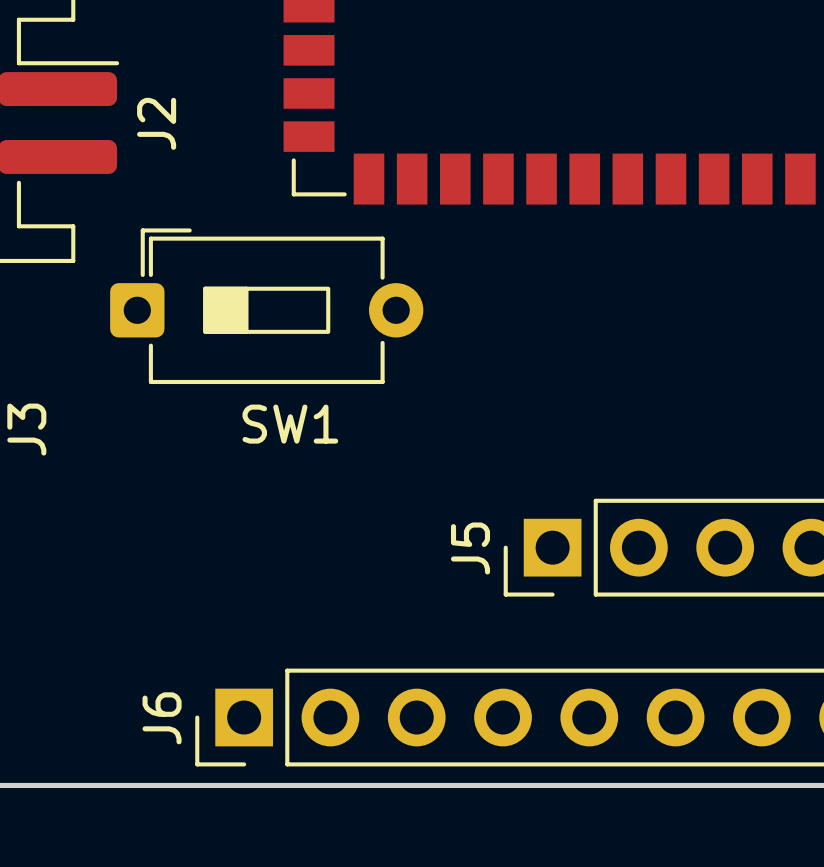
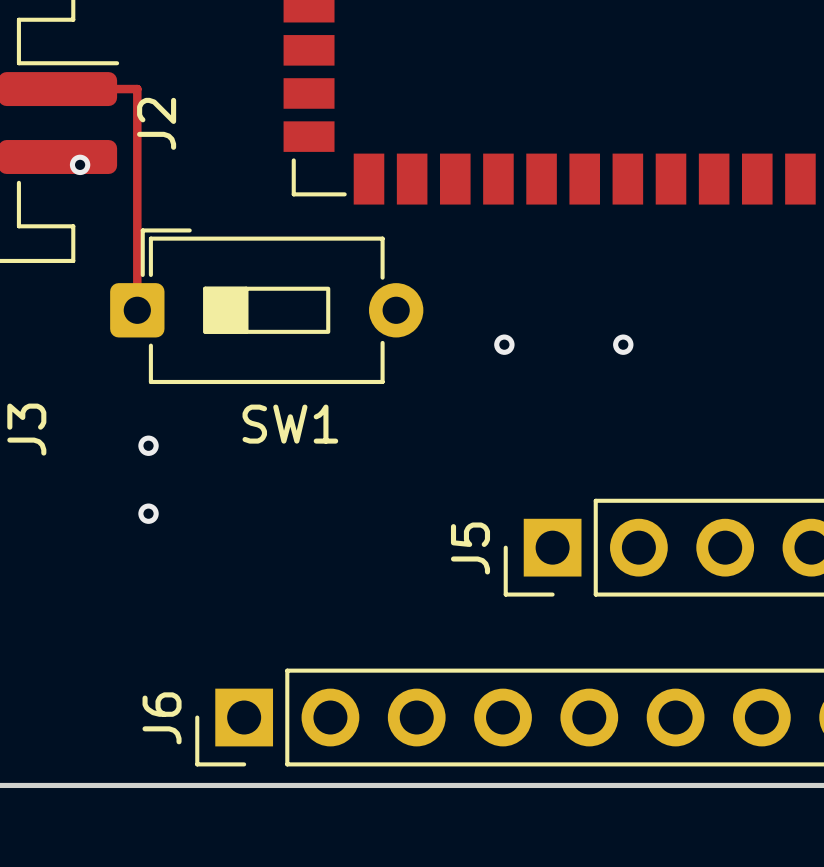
track: none -> (57, 89) (137, 89) (137, 310)
via: none -> (80, 164)
via: none -> (504, 344)
via: none -> (623, 344)
via: none -> (148, 445)
via: none -> (148, 513)

